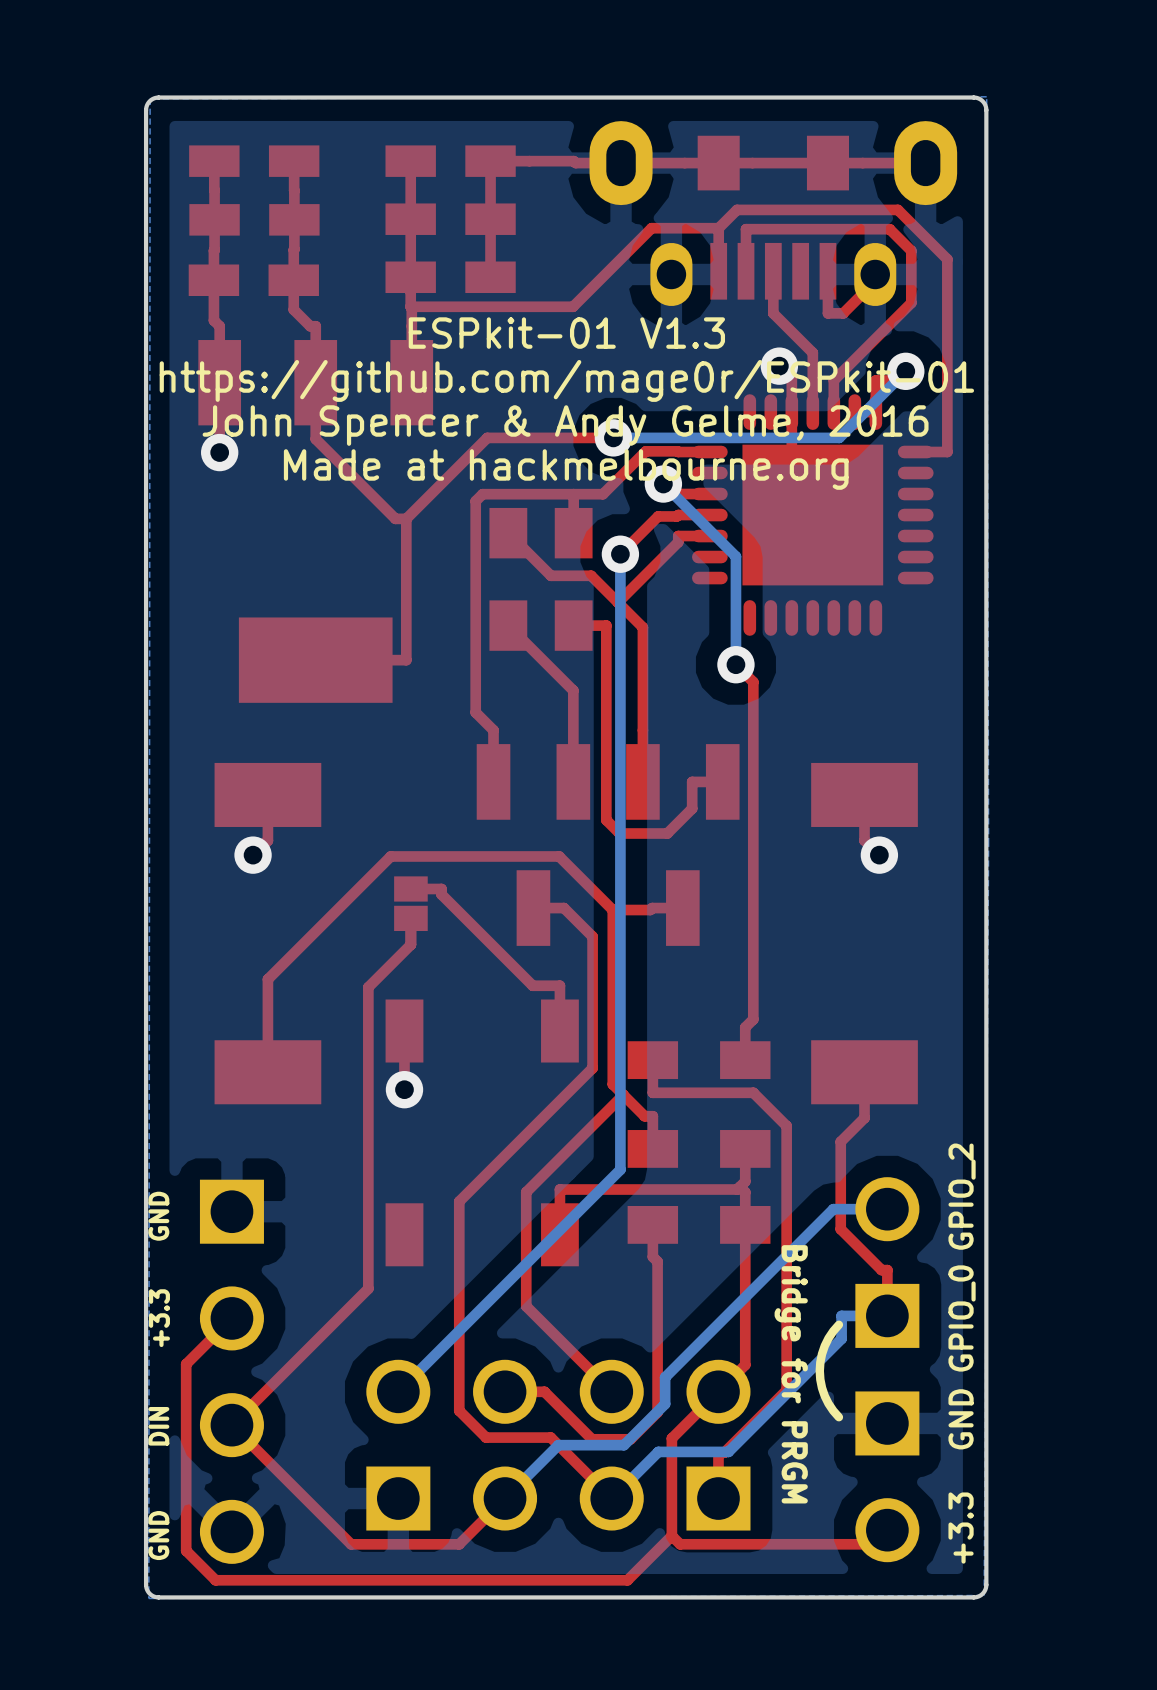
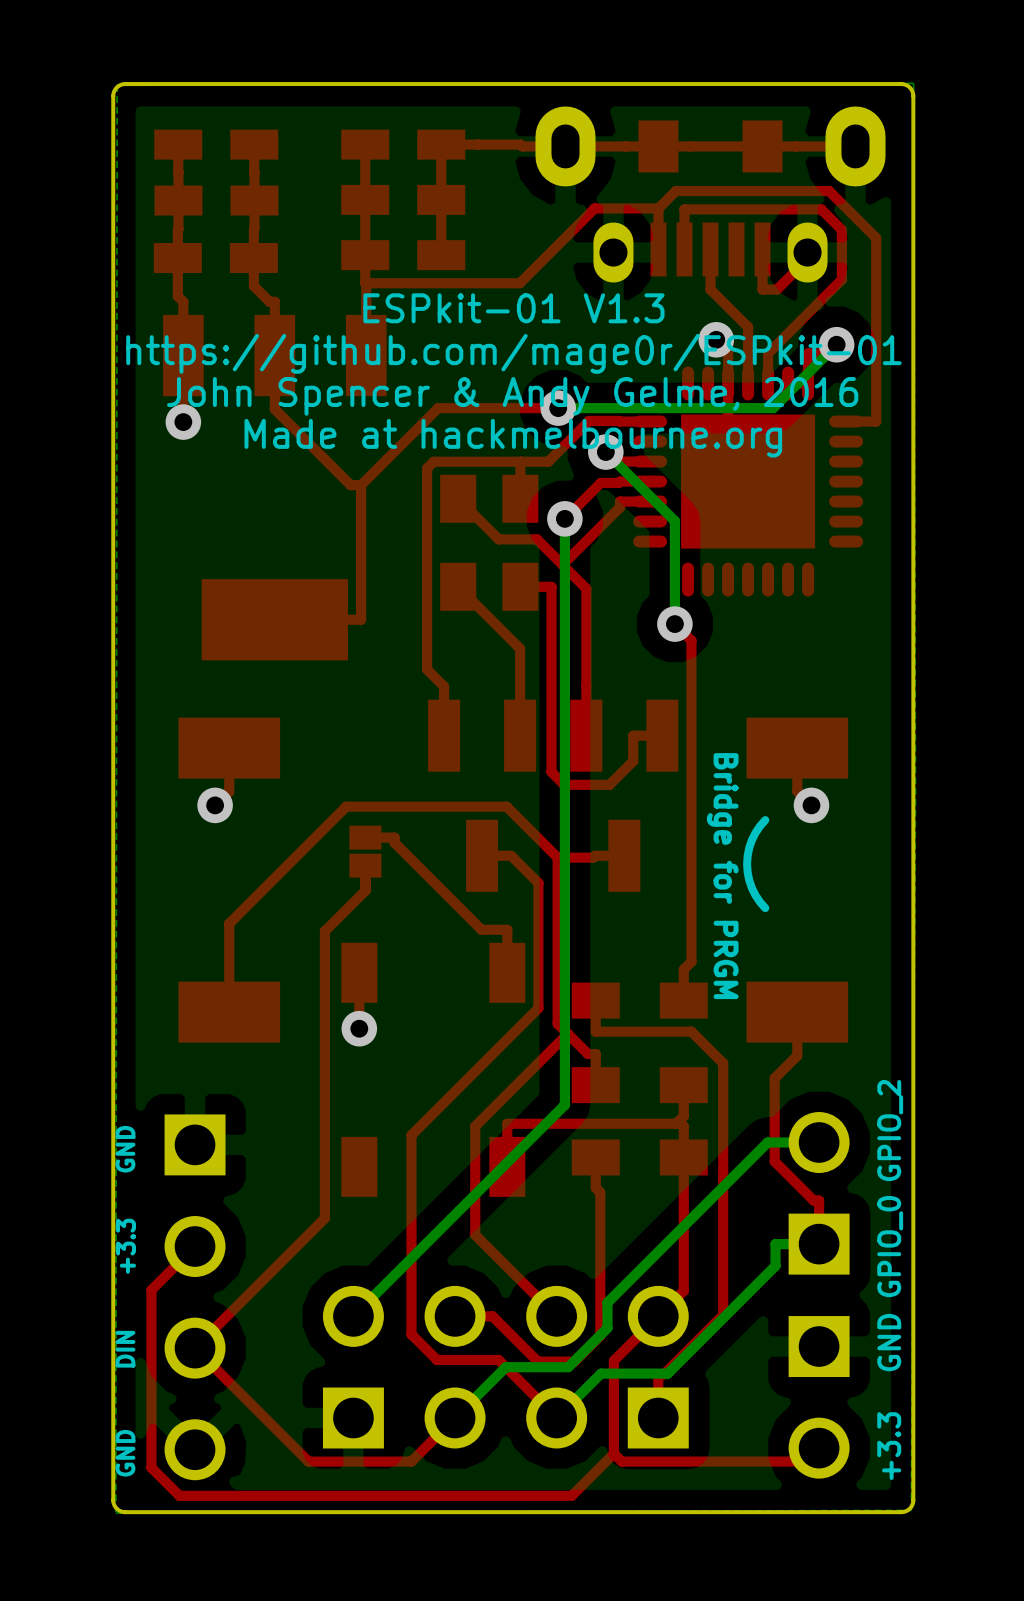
line: (838, 1324) (824, 1345) (819, 1370) (824, 1396) (838, 1417) -> (765, 820) (751, 840) (747, 864) (751, 887) (765, 908)
text position: Bridge for PRGM (791, 1374) -> Bridge for PRGM (722, 876)

